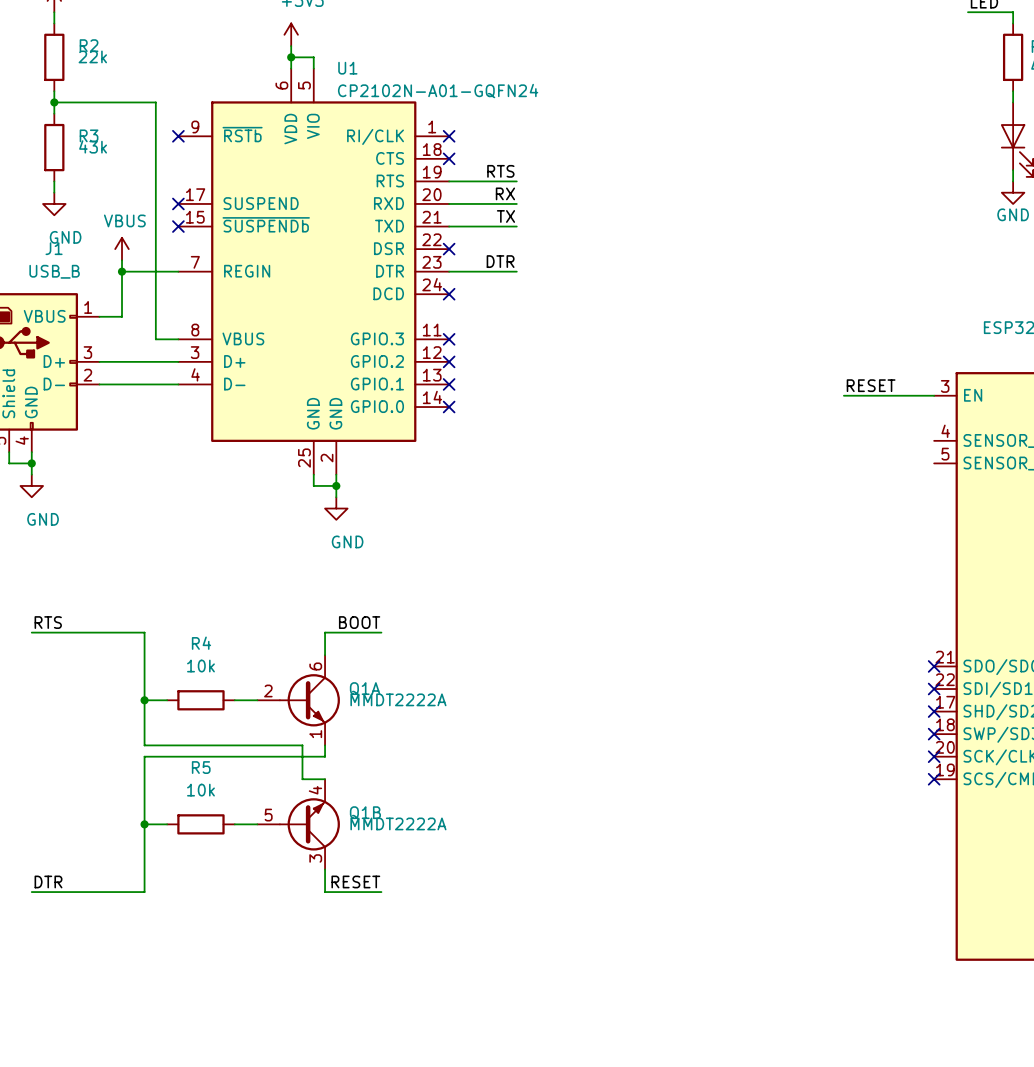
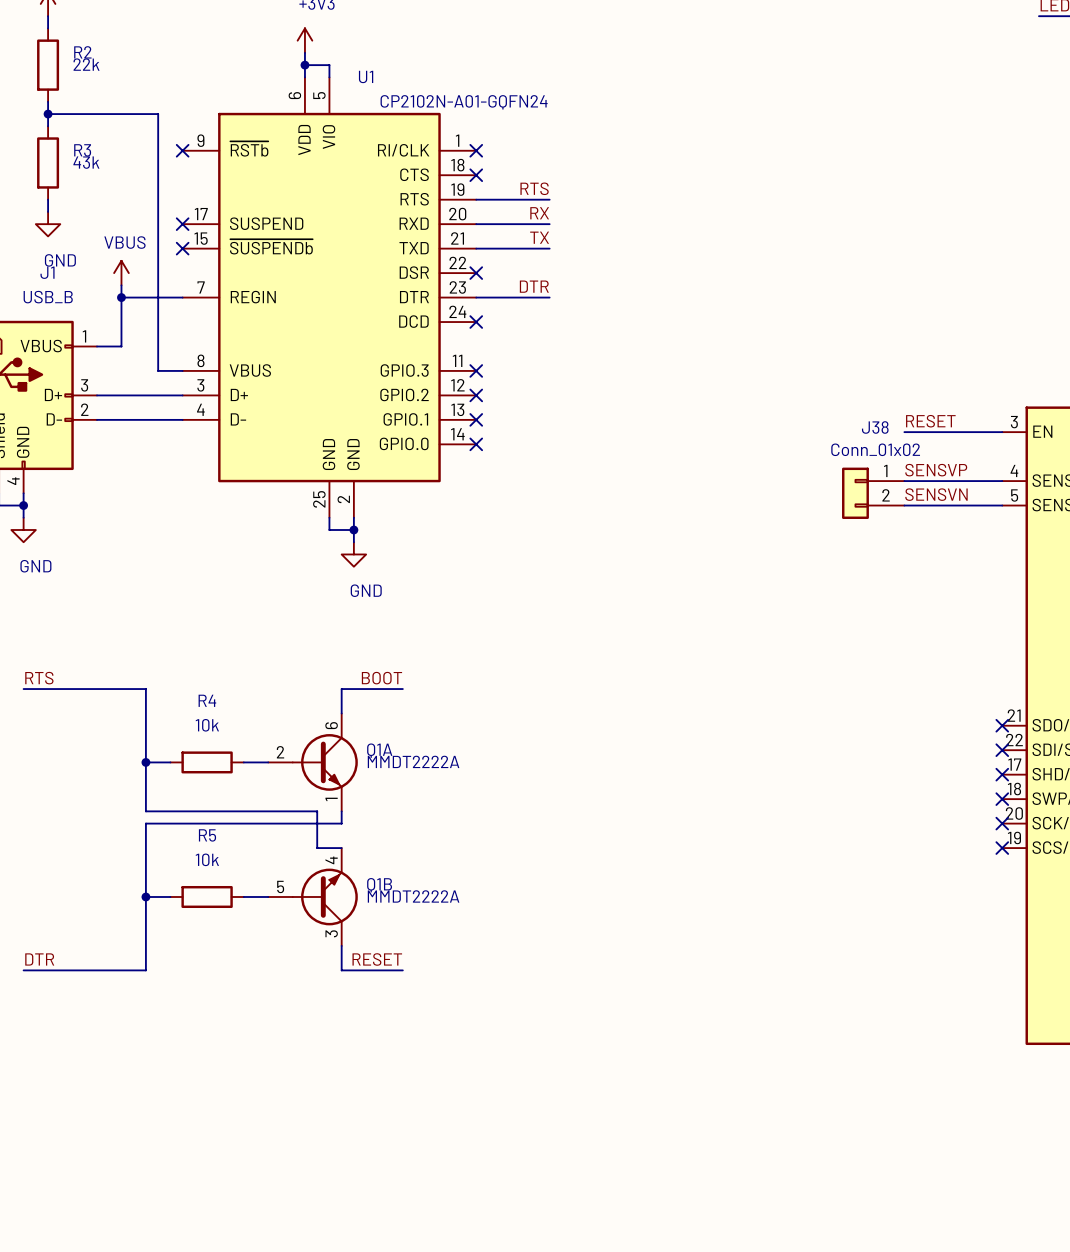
label: none -> SENSVP (936, 470)
wire: none -> (904, 481) (1002, 481)
J38: none -> Conn_01x02 (873, 493)
label: none -> SENSVN (936, 494)
wire: none -> (904, 505) (1002, 505)

